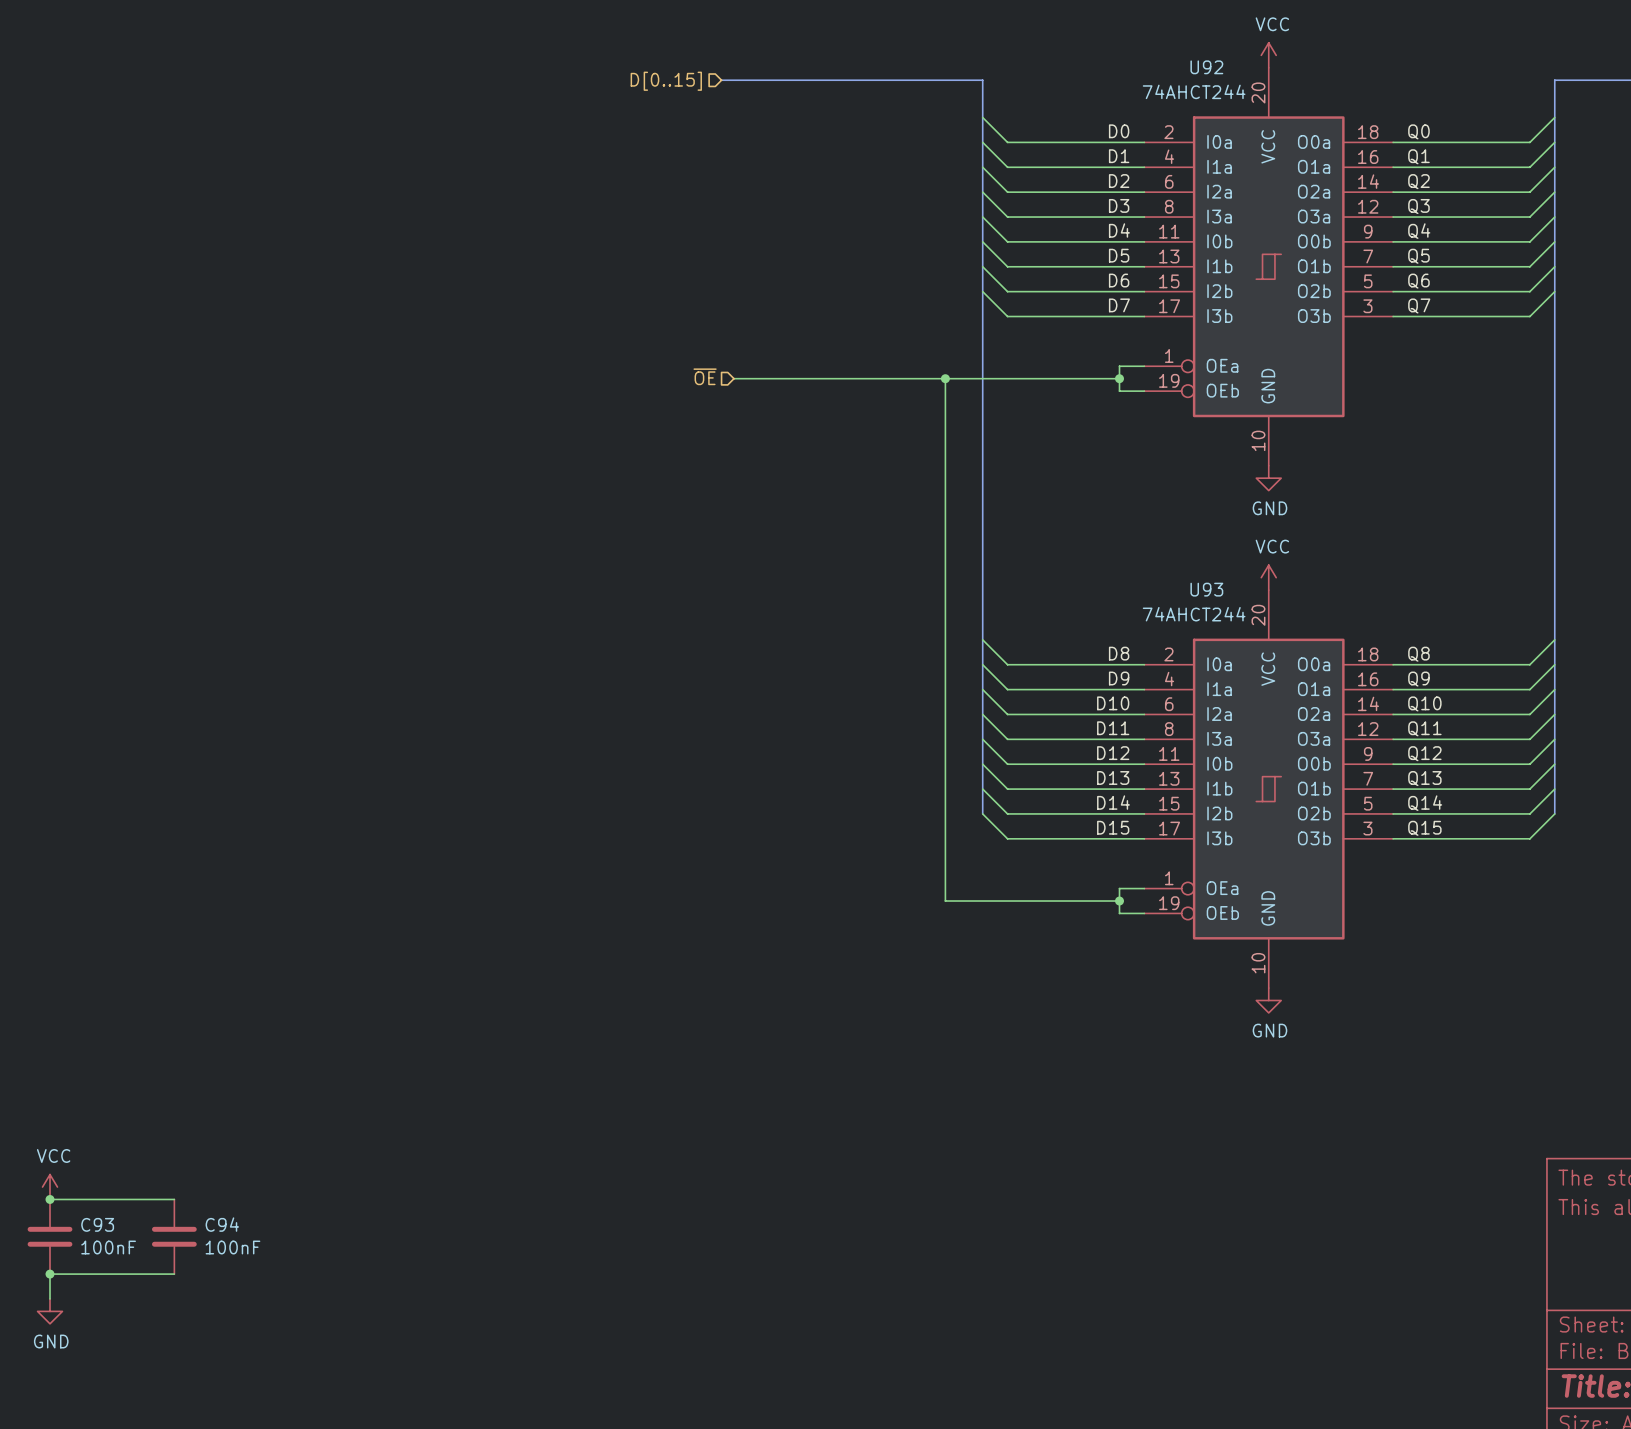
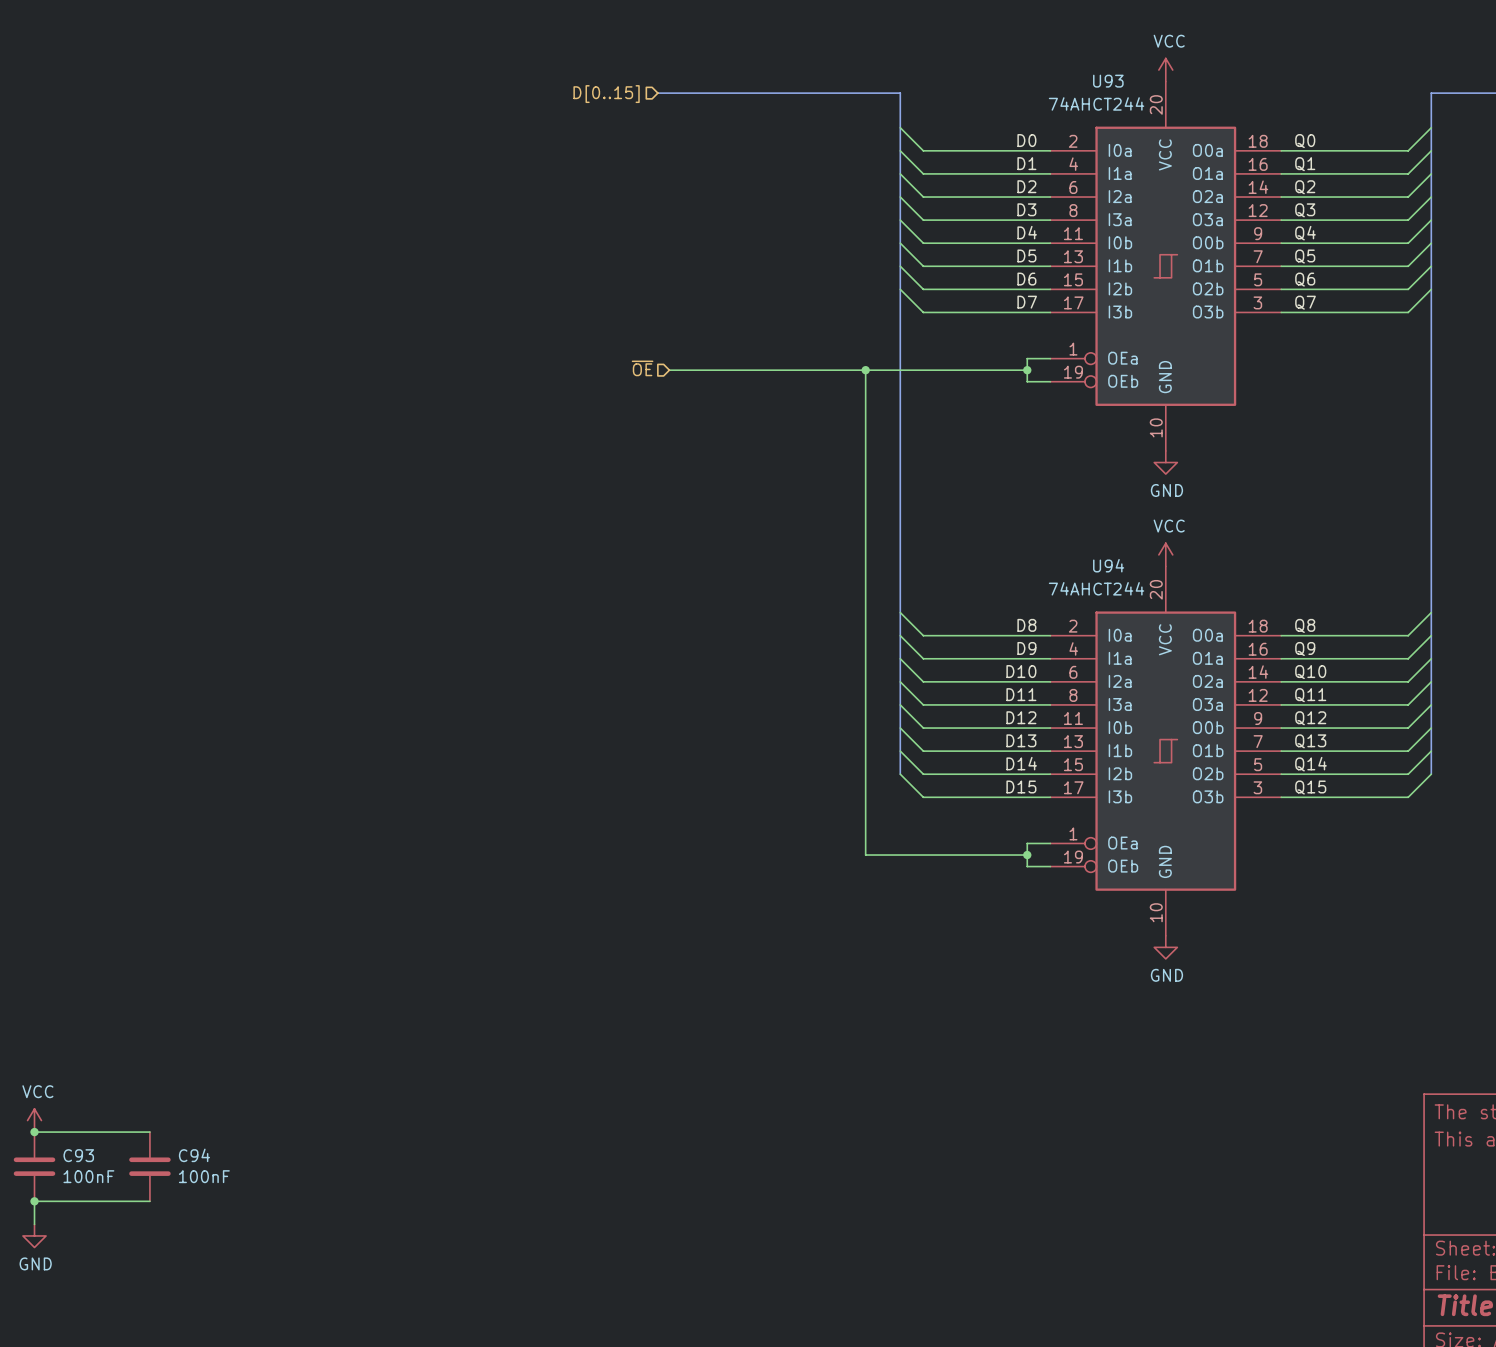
U92 name: U92 (1206, 67) -> U93 (1108, 81)
U93 name: U93 (1206, 589) -> U94 (1108, 565)

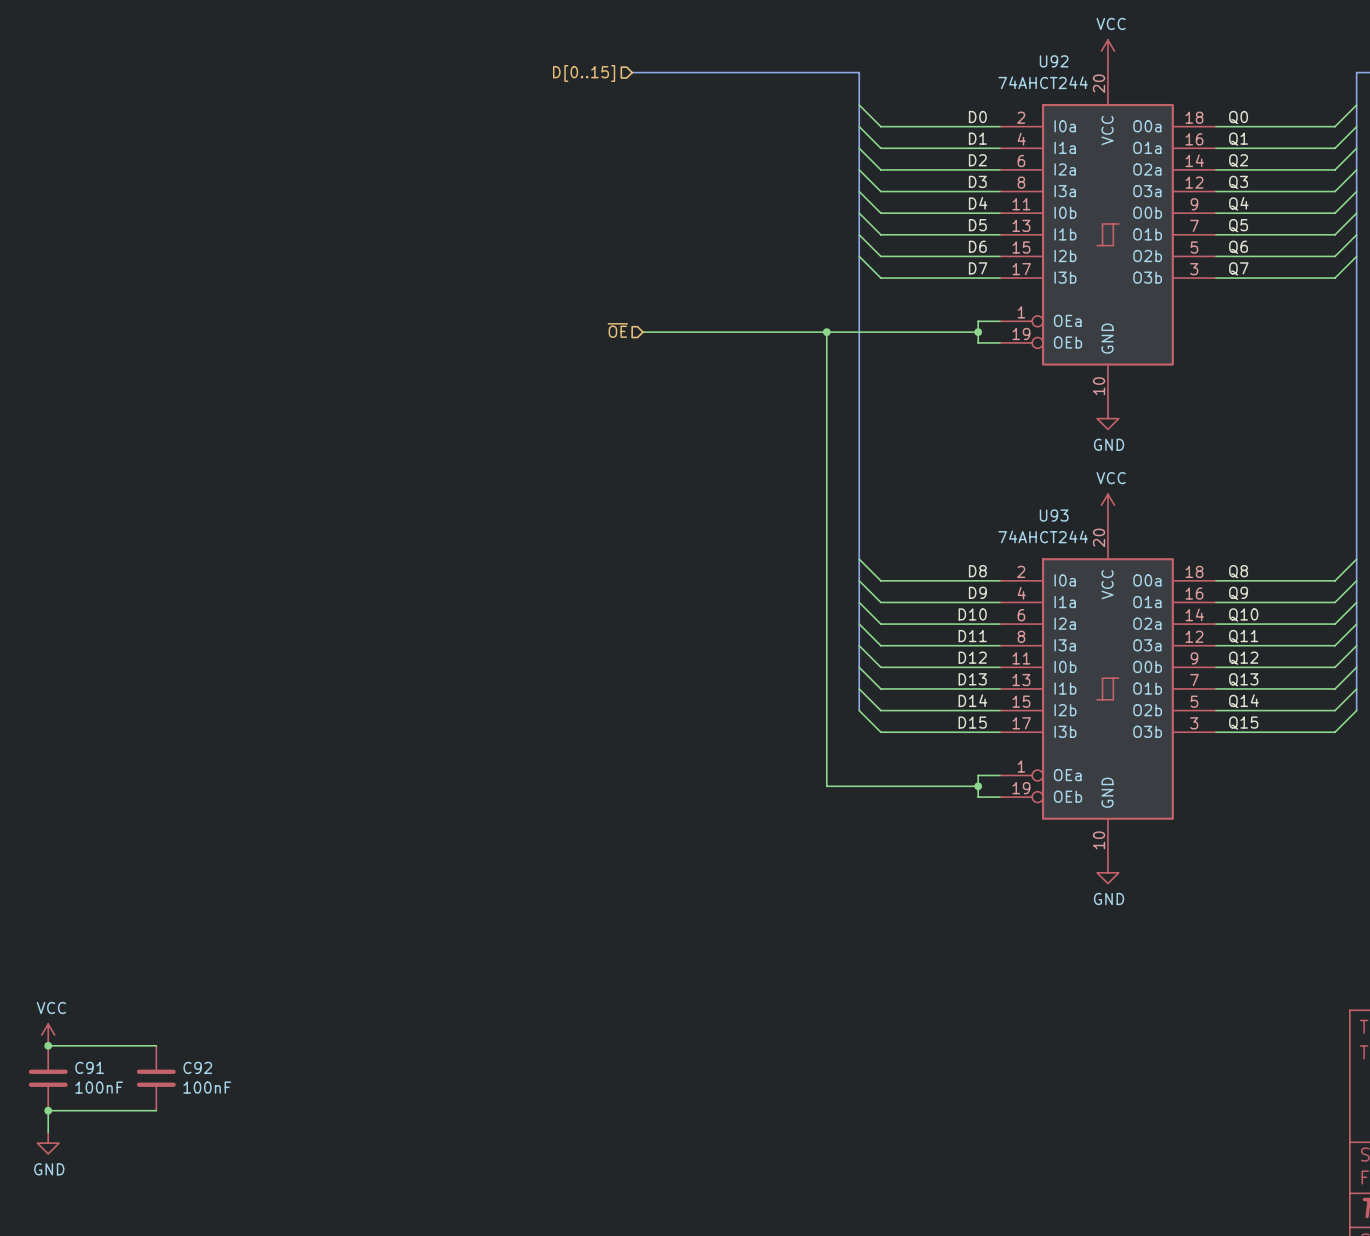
U93 name: U93 (1108, 81) -> U92 (1054, 61)
U94 name: U94 (1108, 565) -> U93 (1054, 515)
C93 name: C93 (78, 1155) -> C91 (89, 1067)
C94 name: C94 (194, 1155) -> C92 (197, 1067)

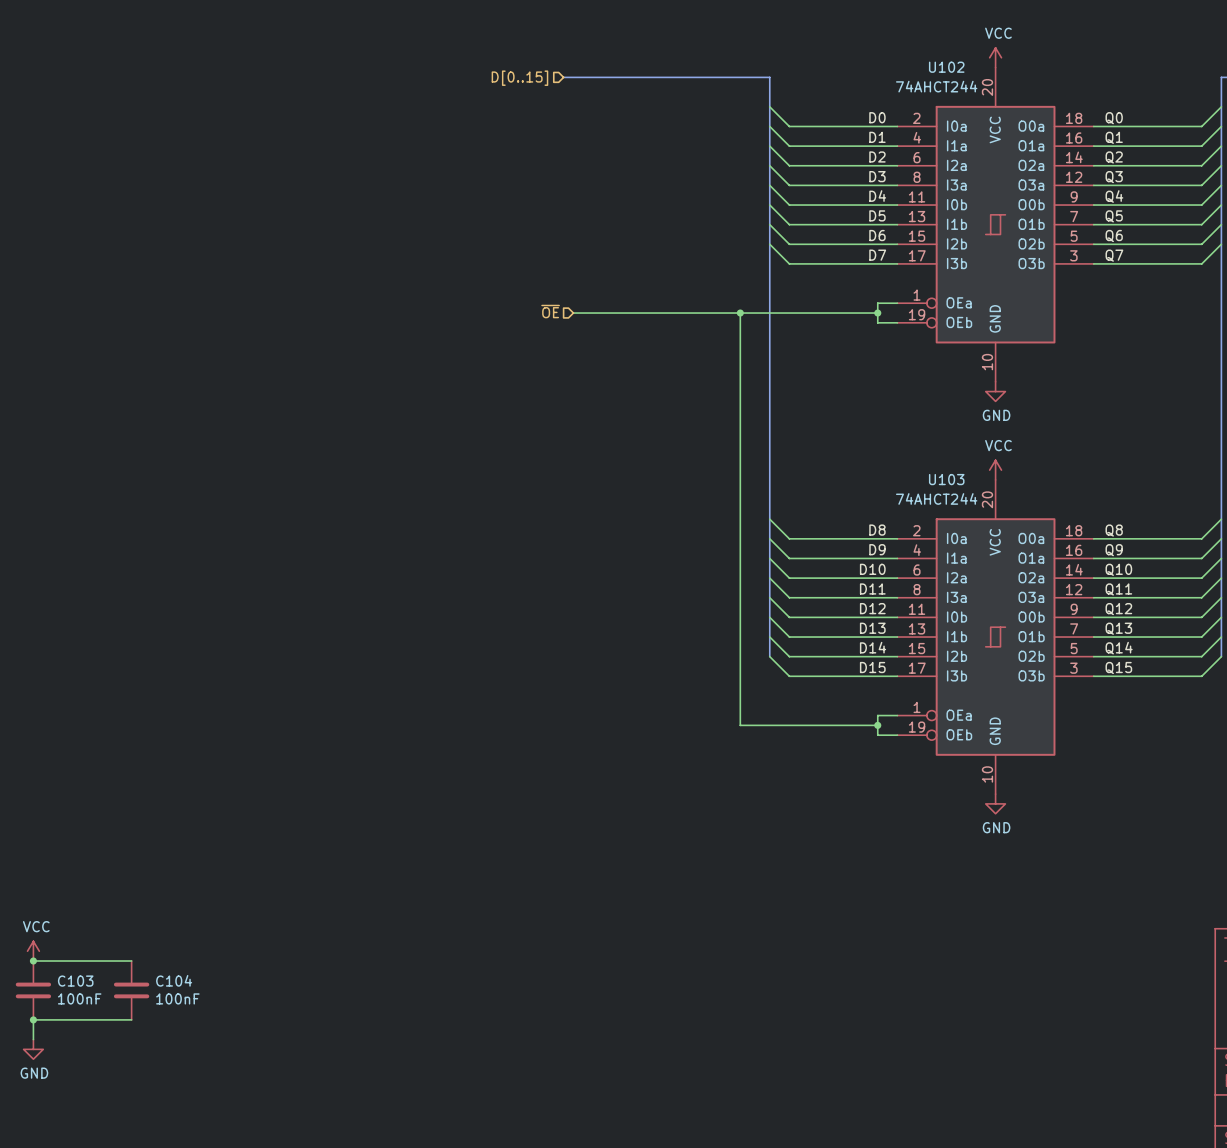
U92 name: U92 (1054, 61) -> U102 (946, 67)
U93 name: U93 (1054, 515) -> U103 (946, 479)
C91 name: C91 (89, 1067) -> C103 (75, 981)
C92 name: C92 (197, 1067) -> C104 (174, 980)

